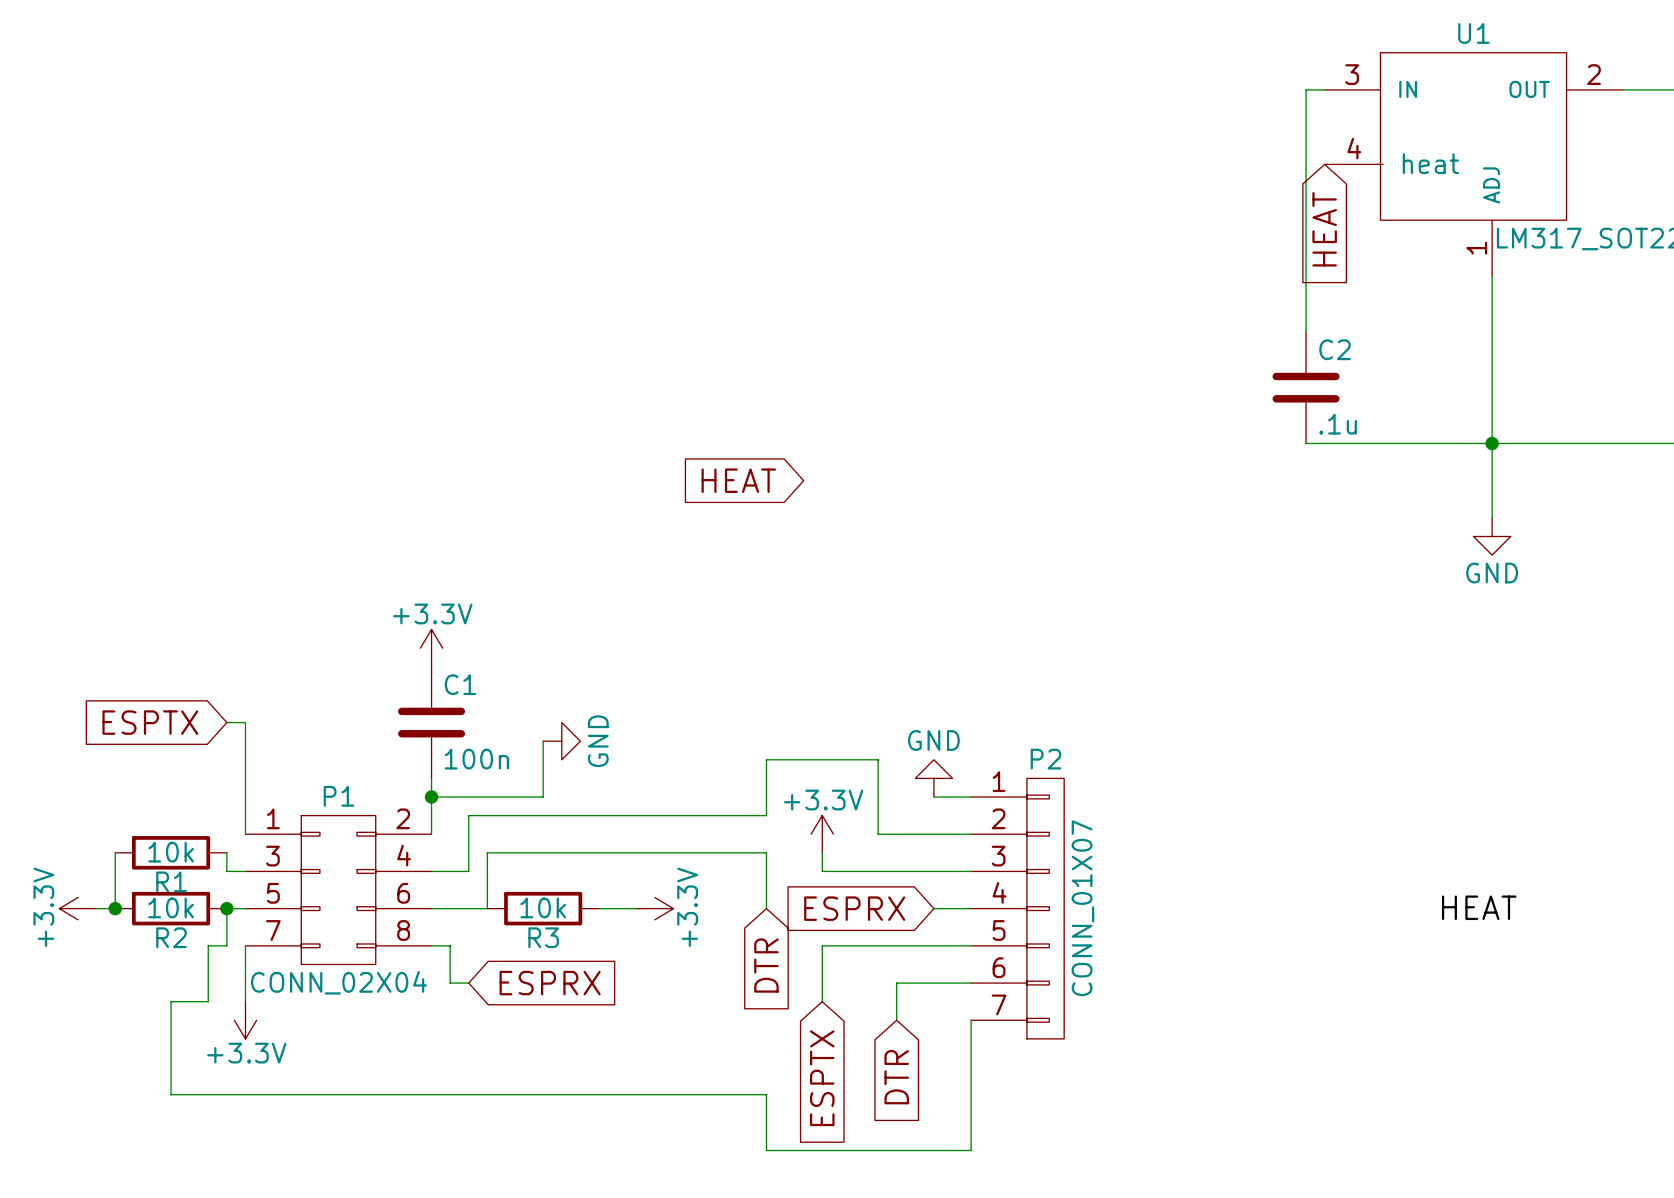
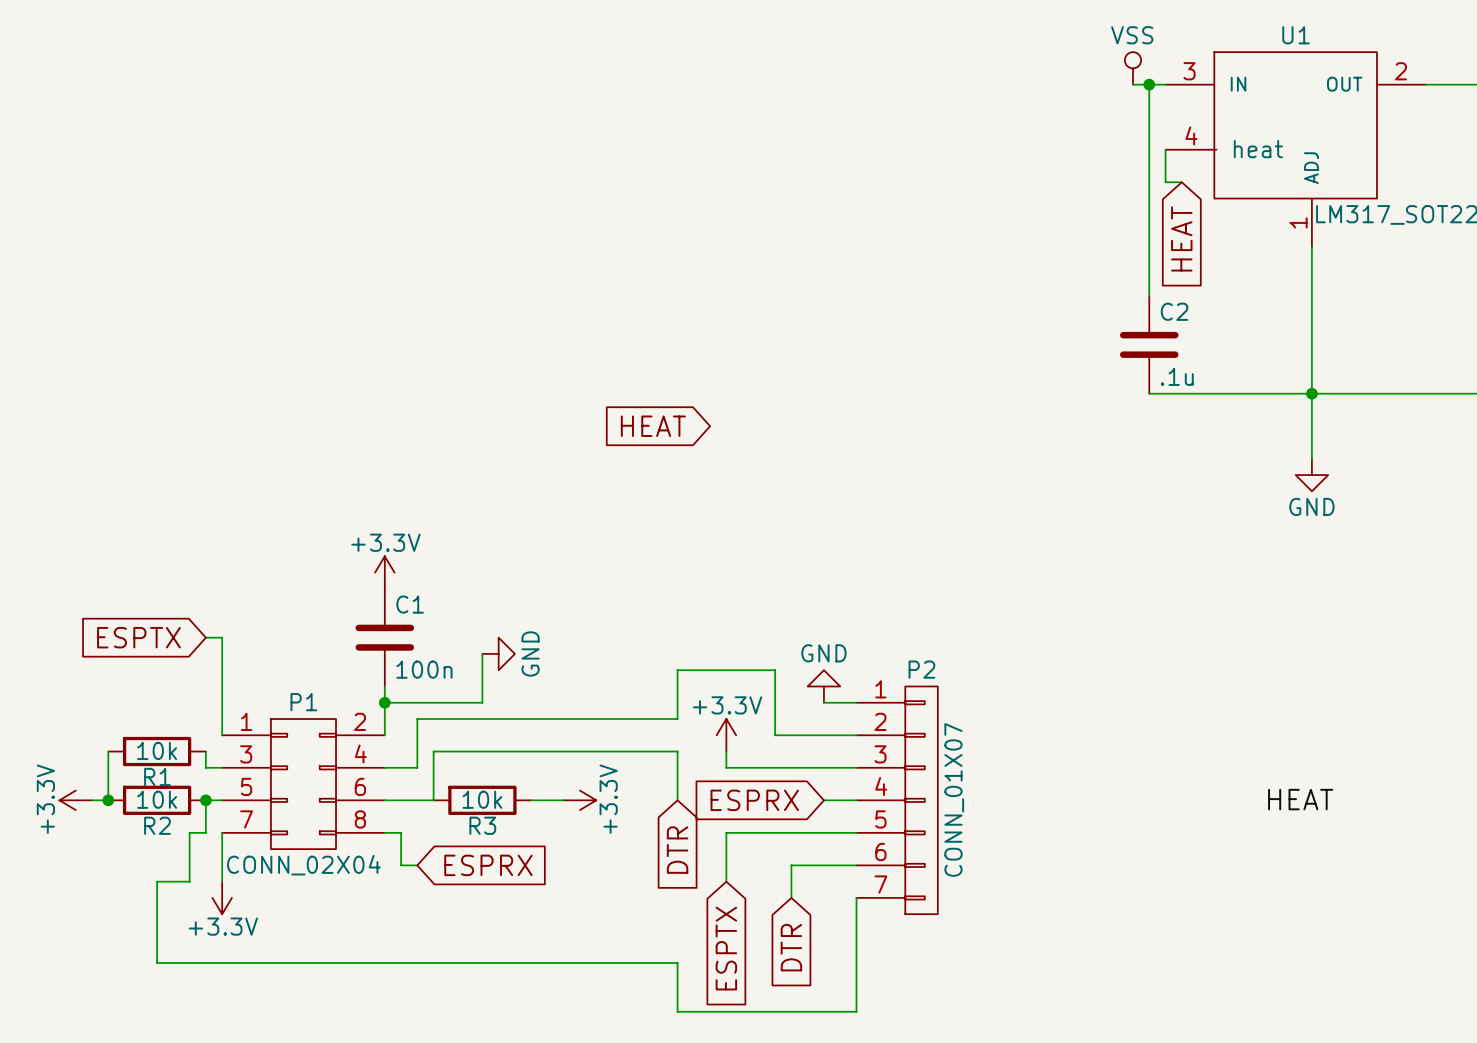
power symbol: none -> VSS (1133, 68)
wire: none -> (1133, 84) (1149, 84)
junction: none -> (1149, 84)
wire: none -> (1165, 149) (1165, 182) (1181, 182)
global label position: HEAT (1324, 229) -> HEAT (1181, 238)

